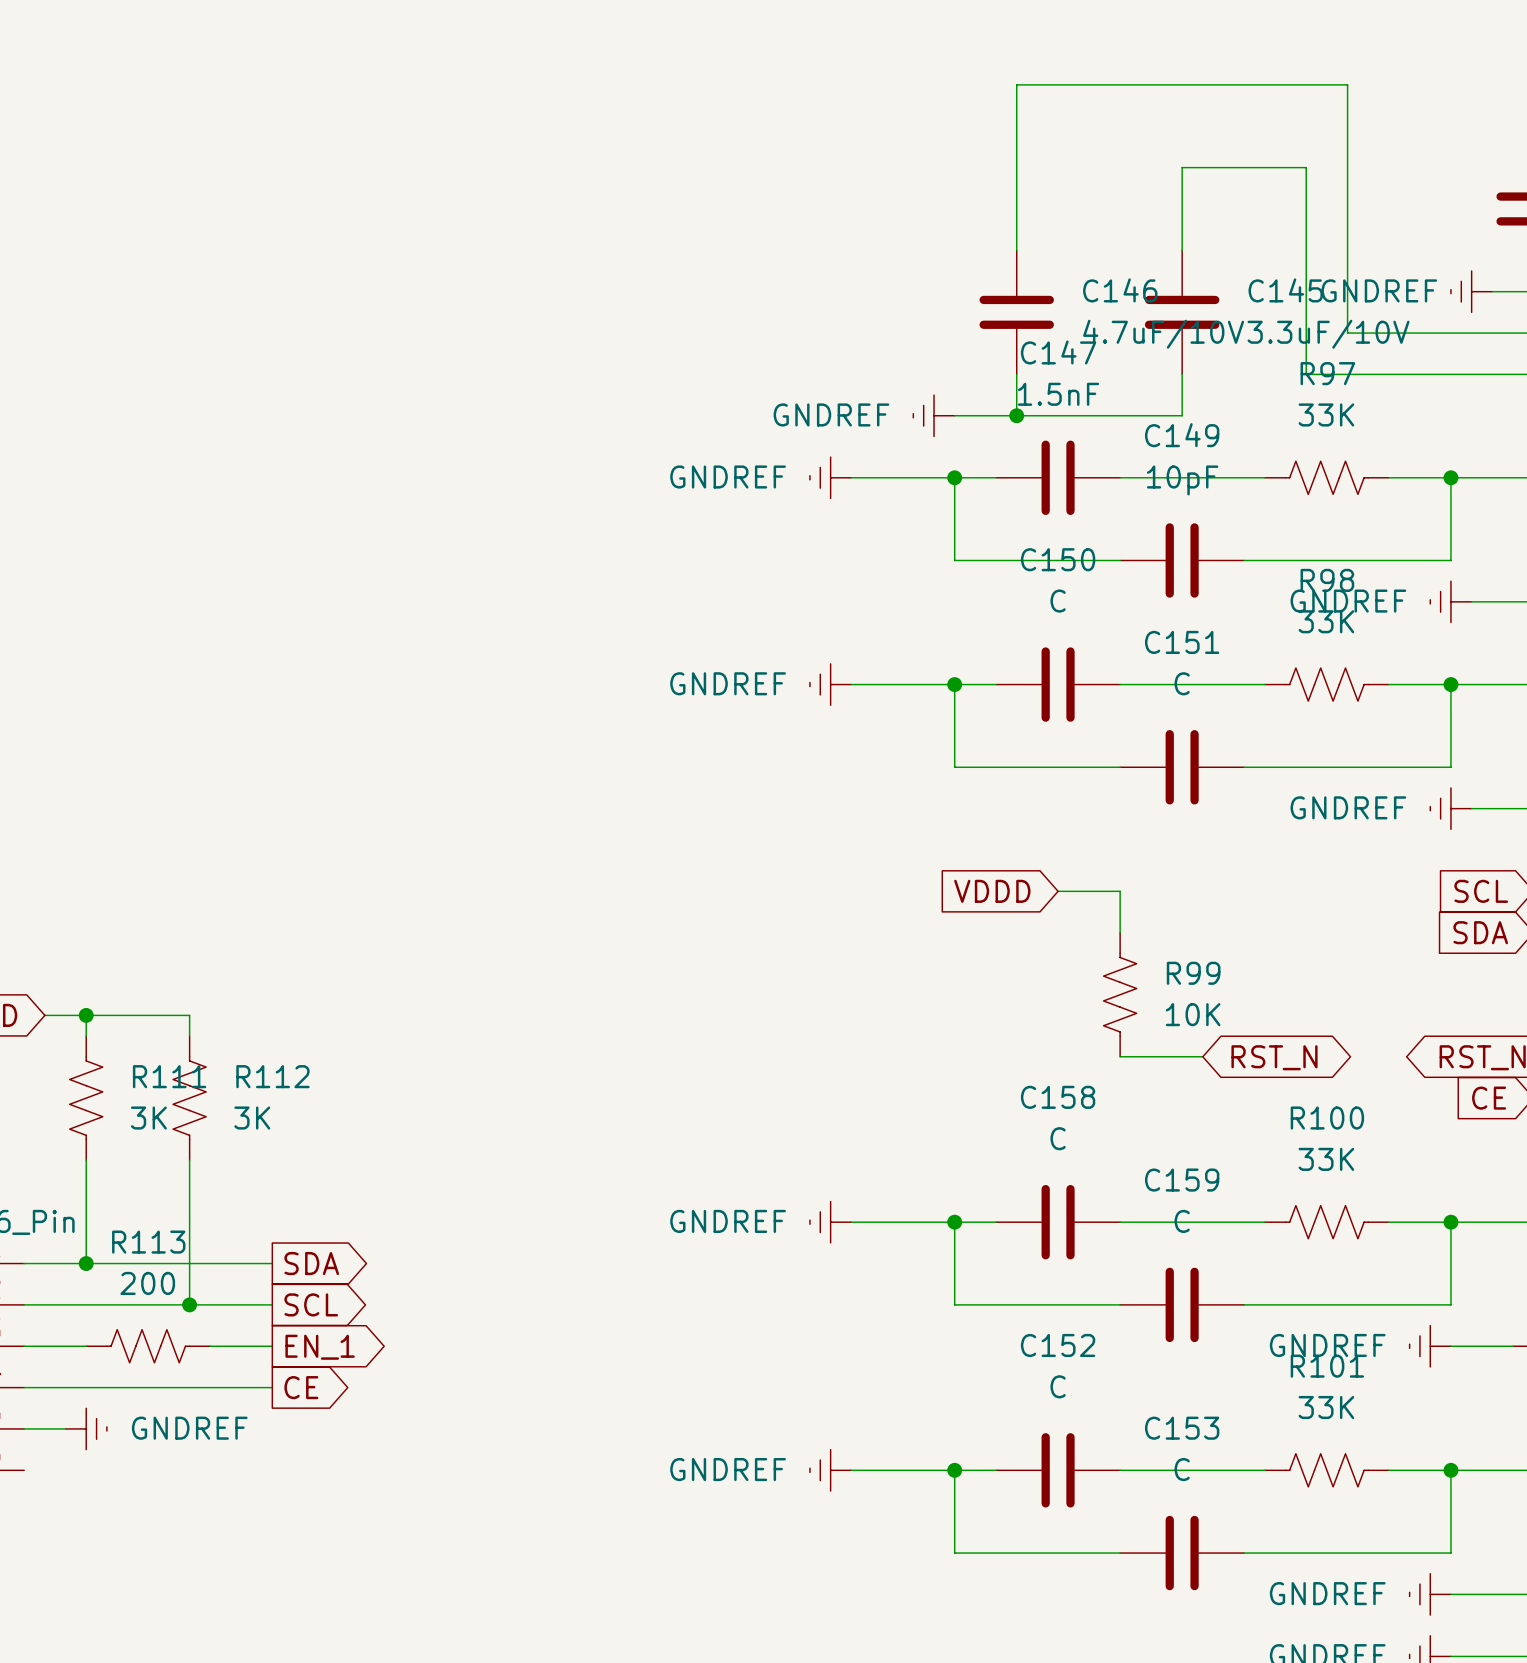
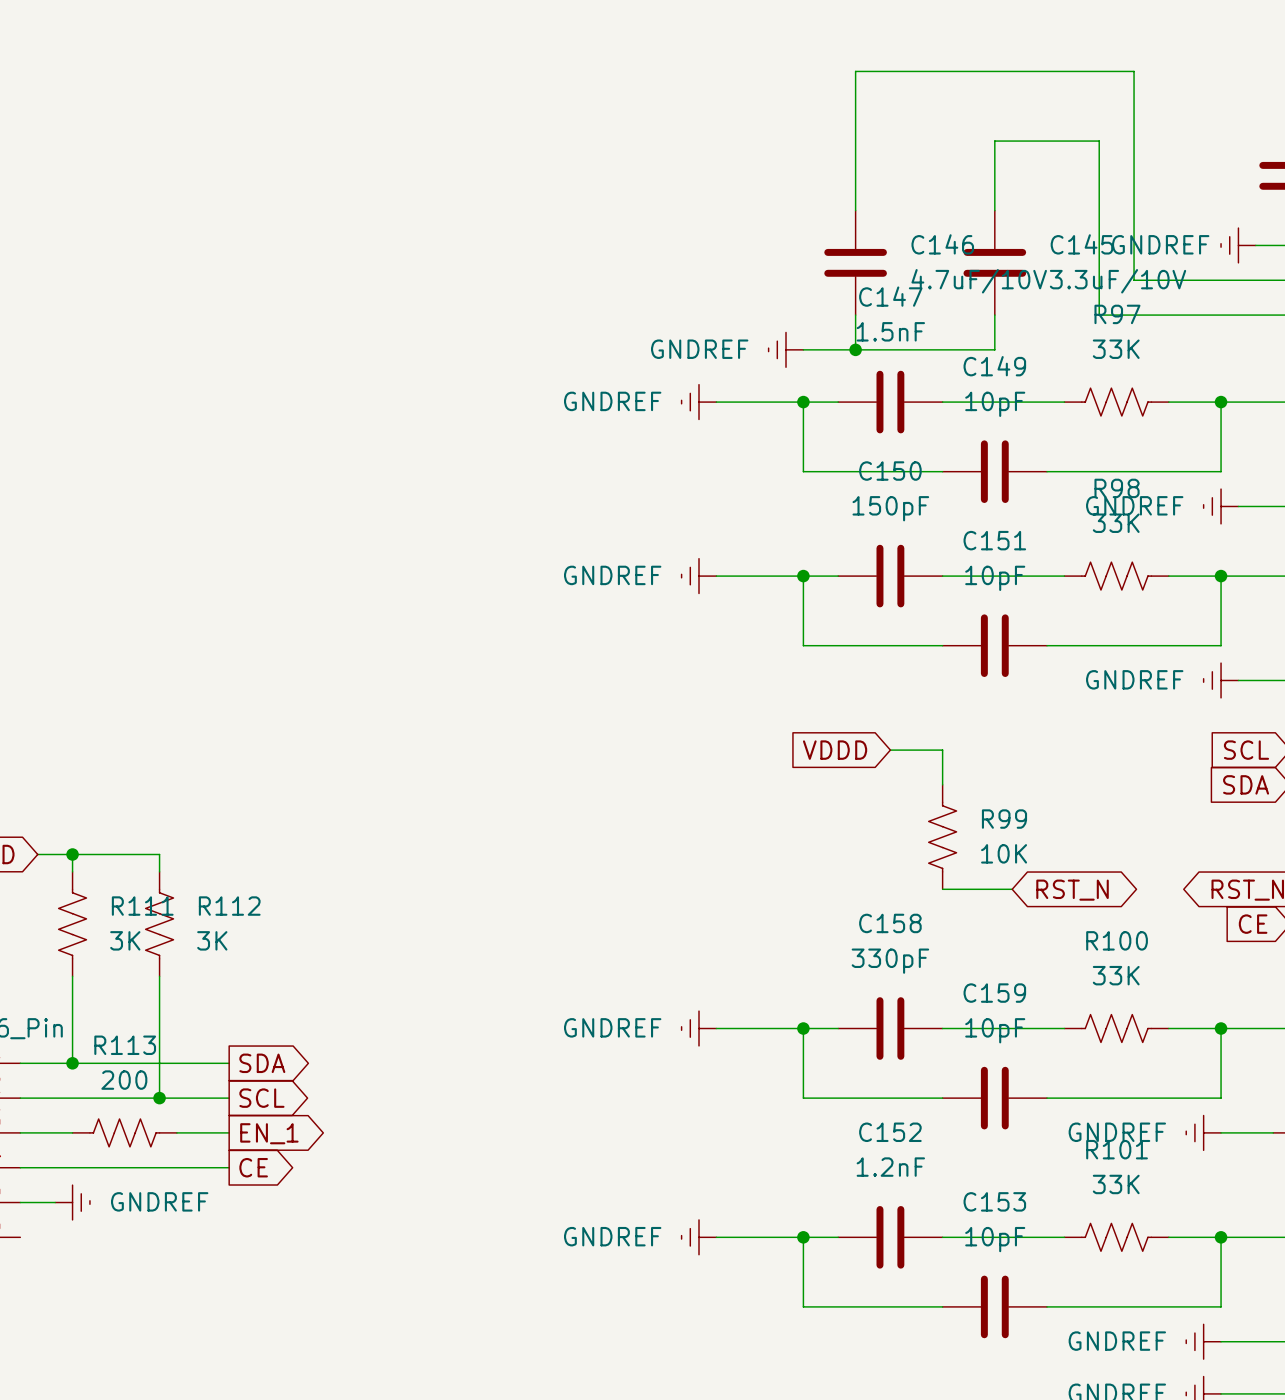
C150 value: C (1058, 601) -> 150pF (890, 508)
C151 value: C (1182, 683) -> 10pF (995, 578)
C158 value: C (1058, 1138) -> 330pF (890, 961)
C159 value: C (1182, 1221) -> 10pF (995, 1030)
C152 value: C (1058, 1386) -> 1.2nF (890, 1167)
C153 value: C (1182, 1469) -> 10pF (995, 1239)

